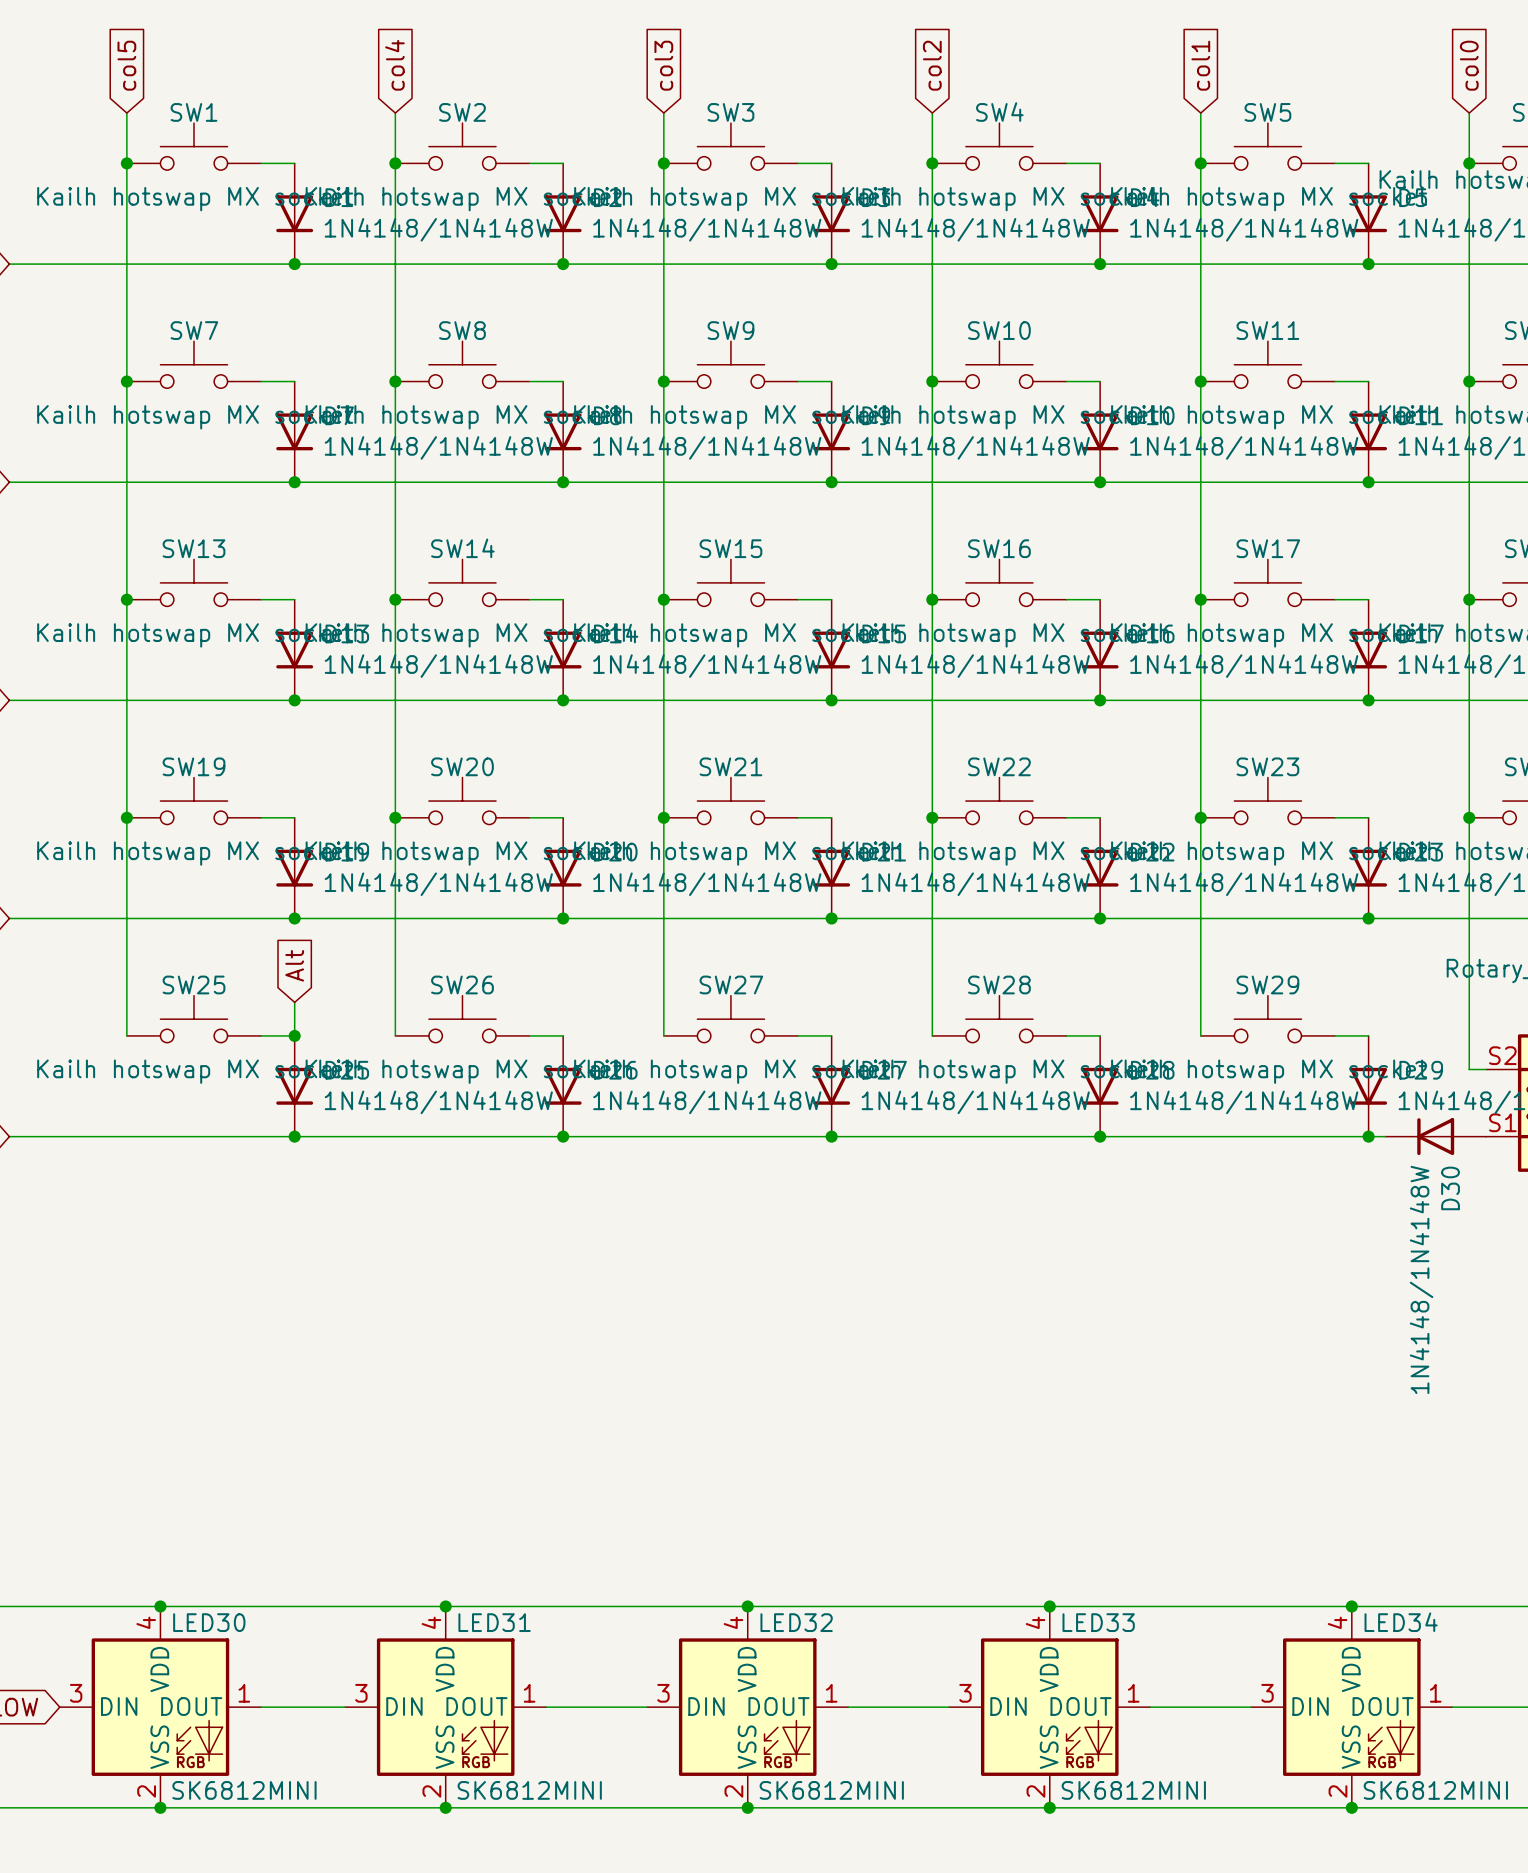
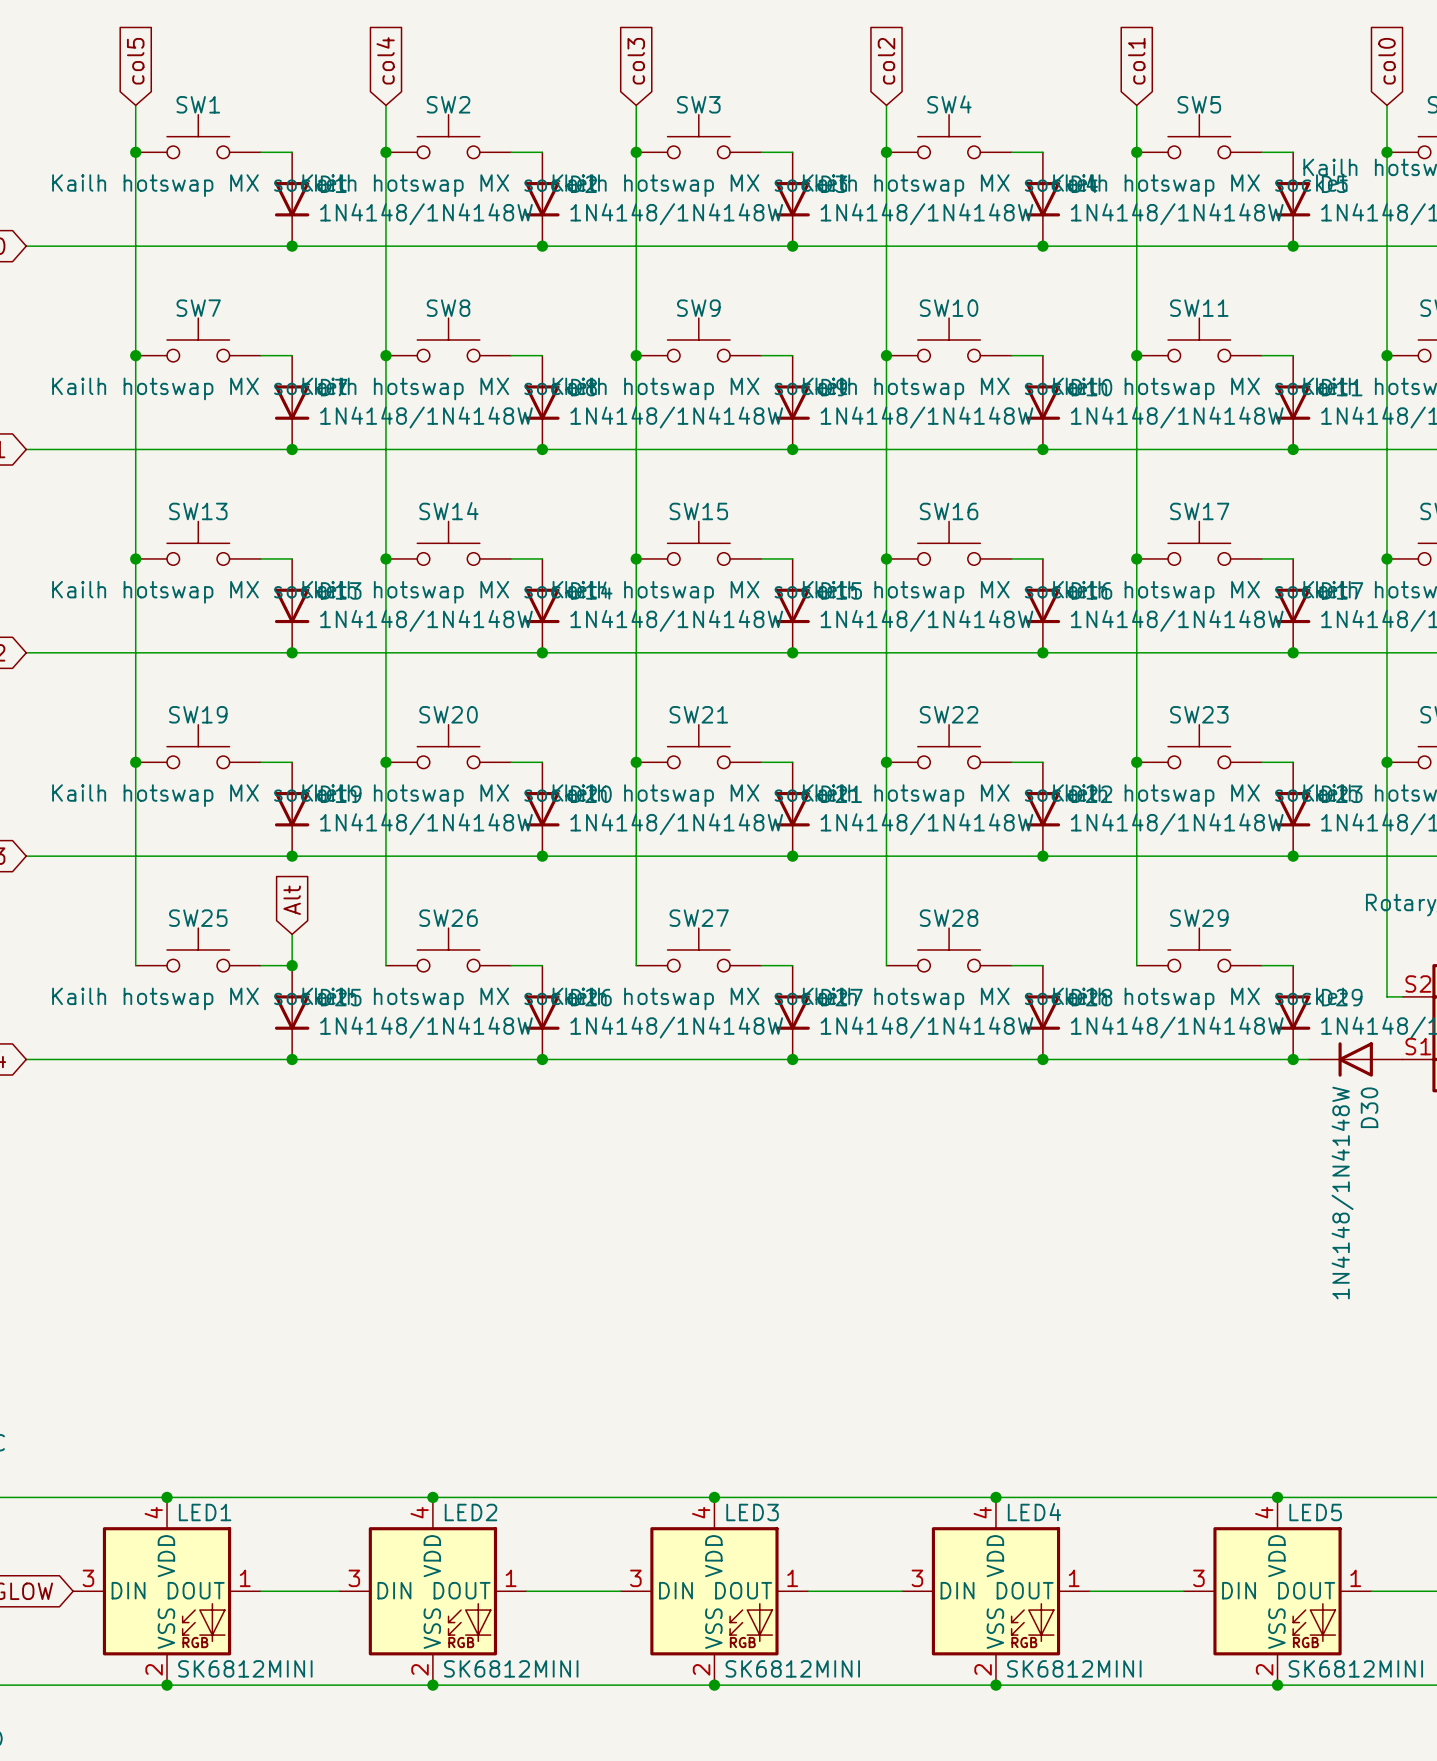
LED30 name: LED30 (209, 1622) -> LED1 (205, 1512)
LED31 name: LED31 (494, 1622) -> LED2 (471, 1512)
LED32 name: LED32 (796, 1622) -> LED3 (752, 1512)
LED33 name: LED33 (1098, 1622) -> LED4 (1034, 1512)
LED34 name: LED34 (1401, 1622) -> LED5 (1315, 1512)

